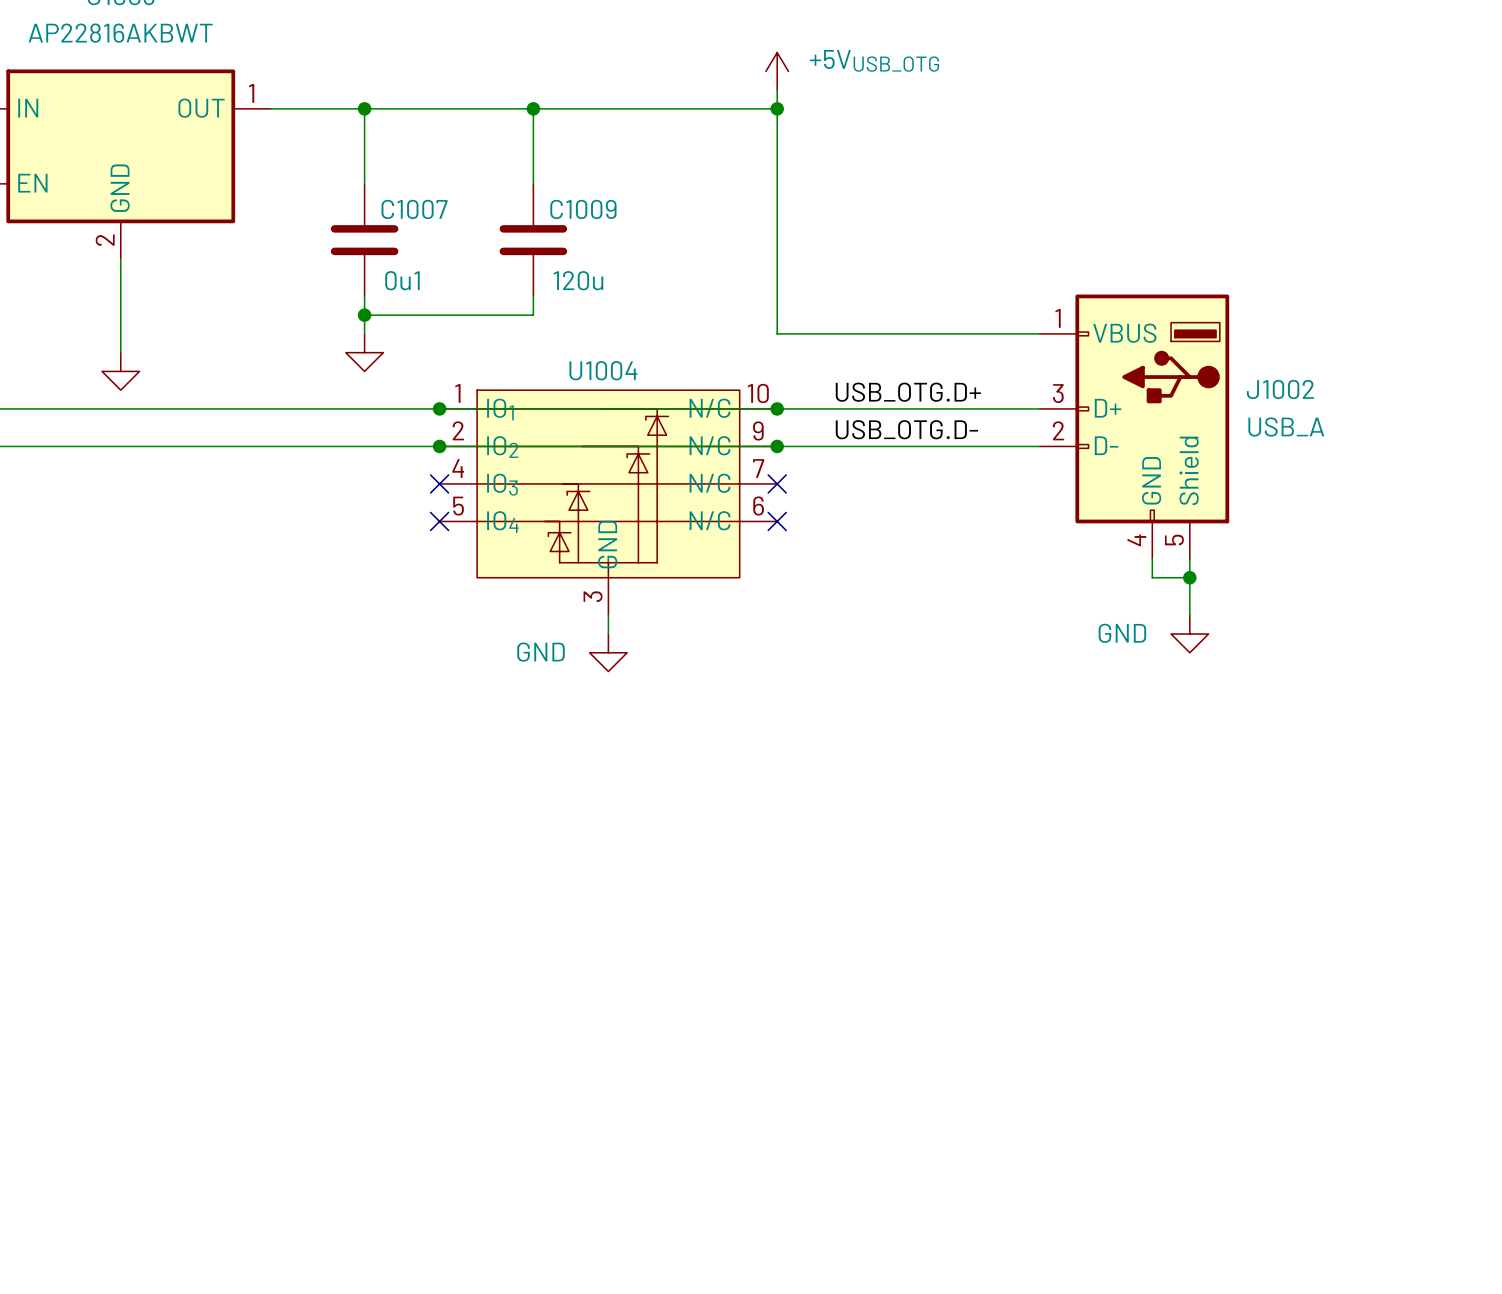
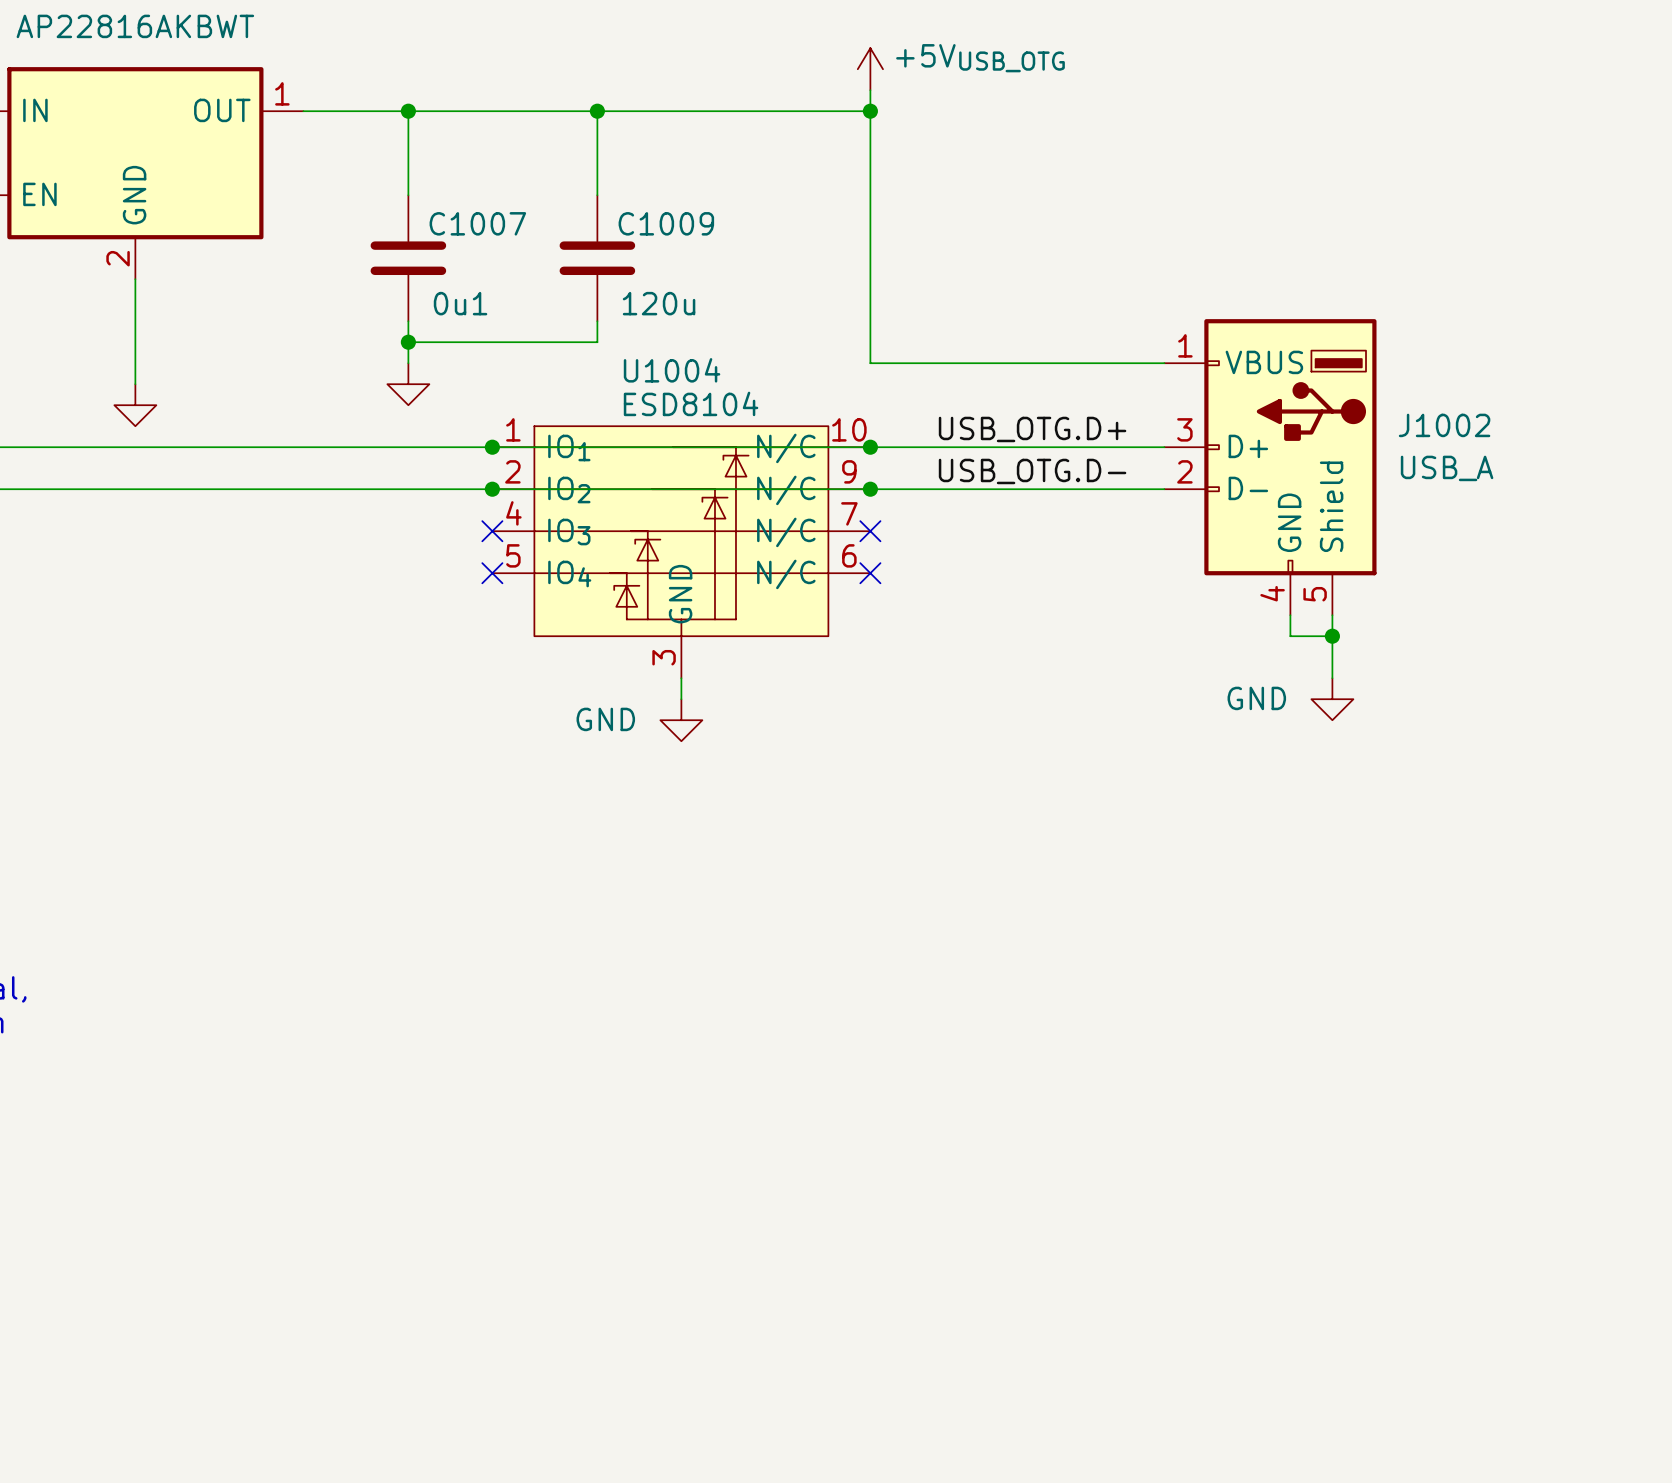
U1004 name position: U1004 (603, 370) -> U1004 (672, 370)
U1004 value: none -> ESD8104 (691, 403)

